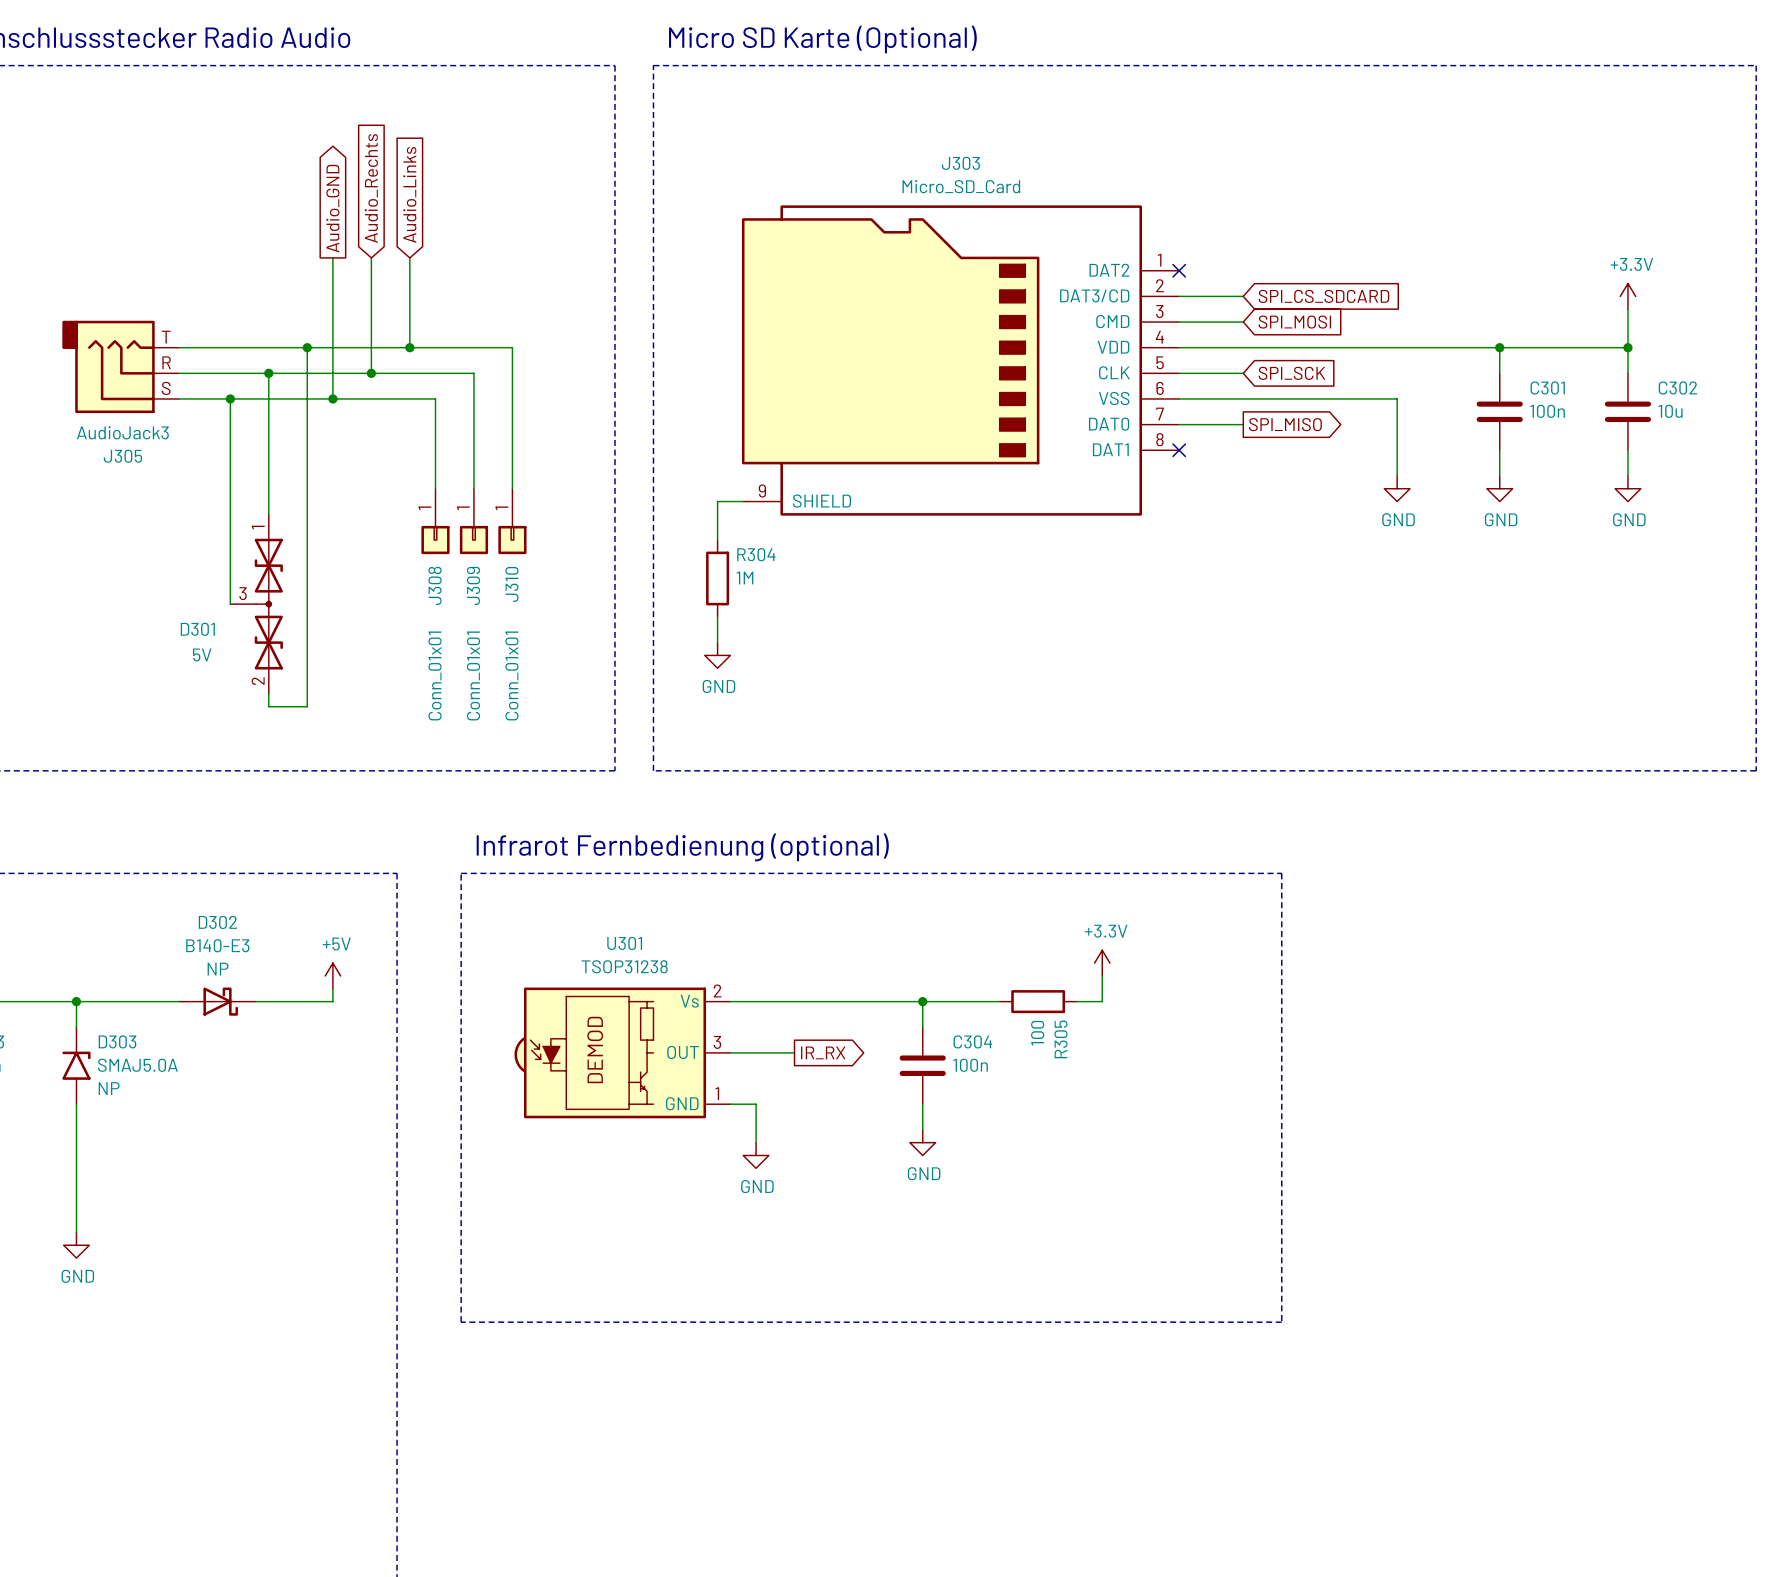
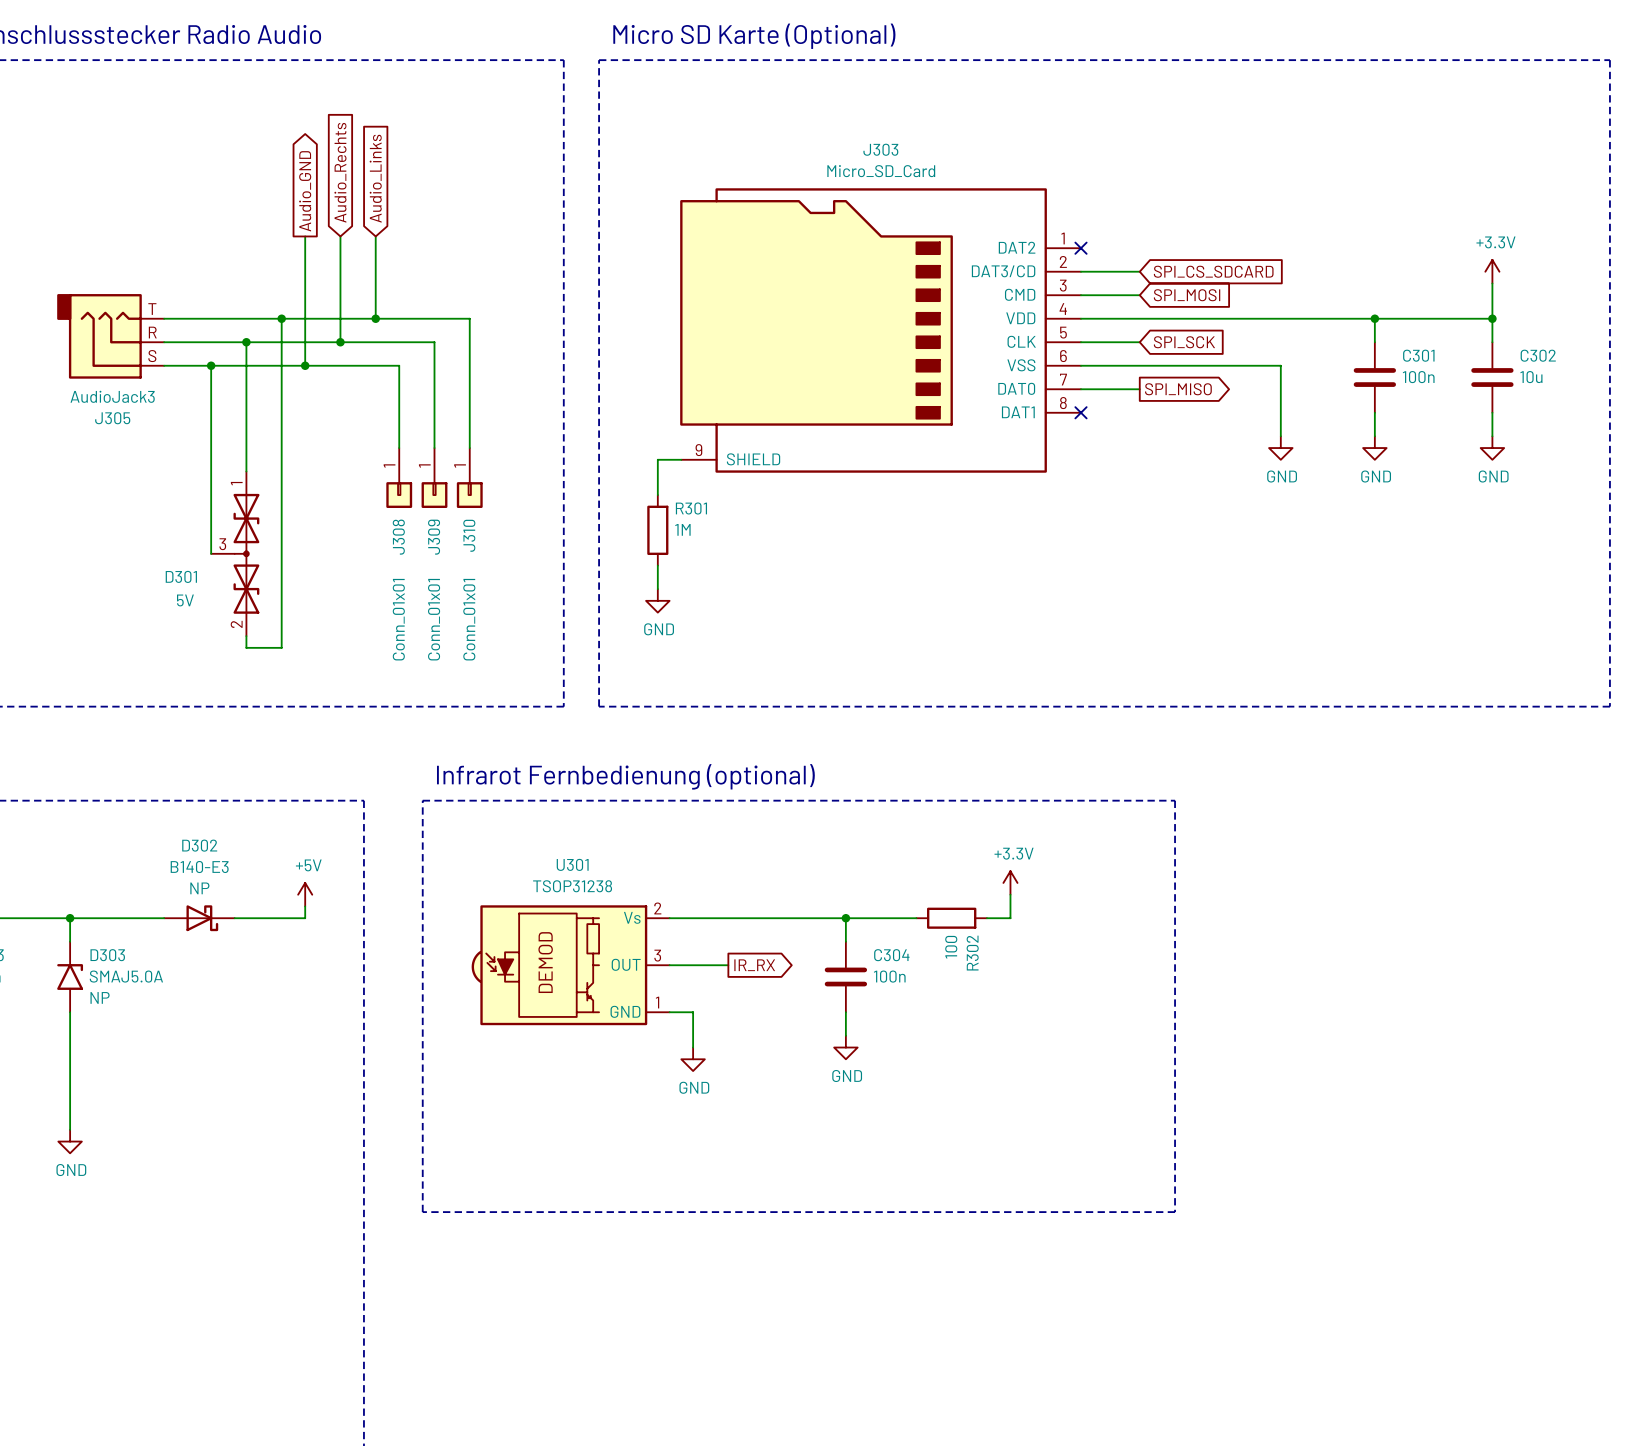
R304 name: R304 (756, 554) -> R301 (691, 508)
R305 name: R305 (1061, 1039) -> R302 (972, 953)

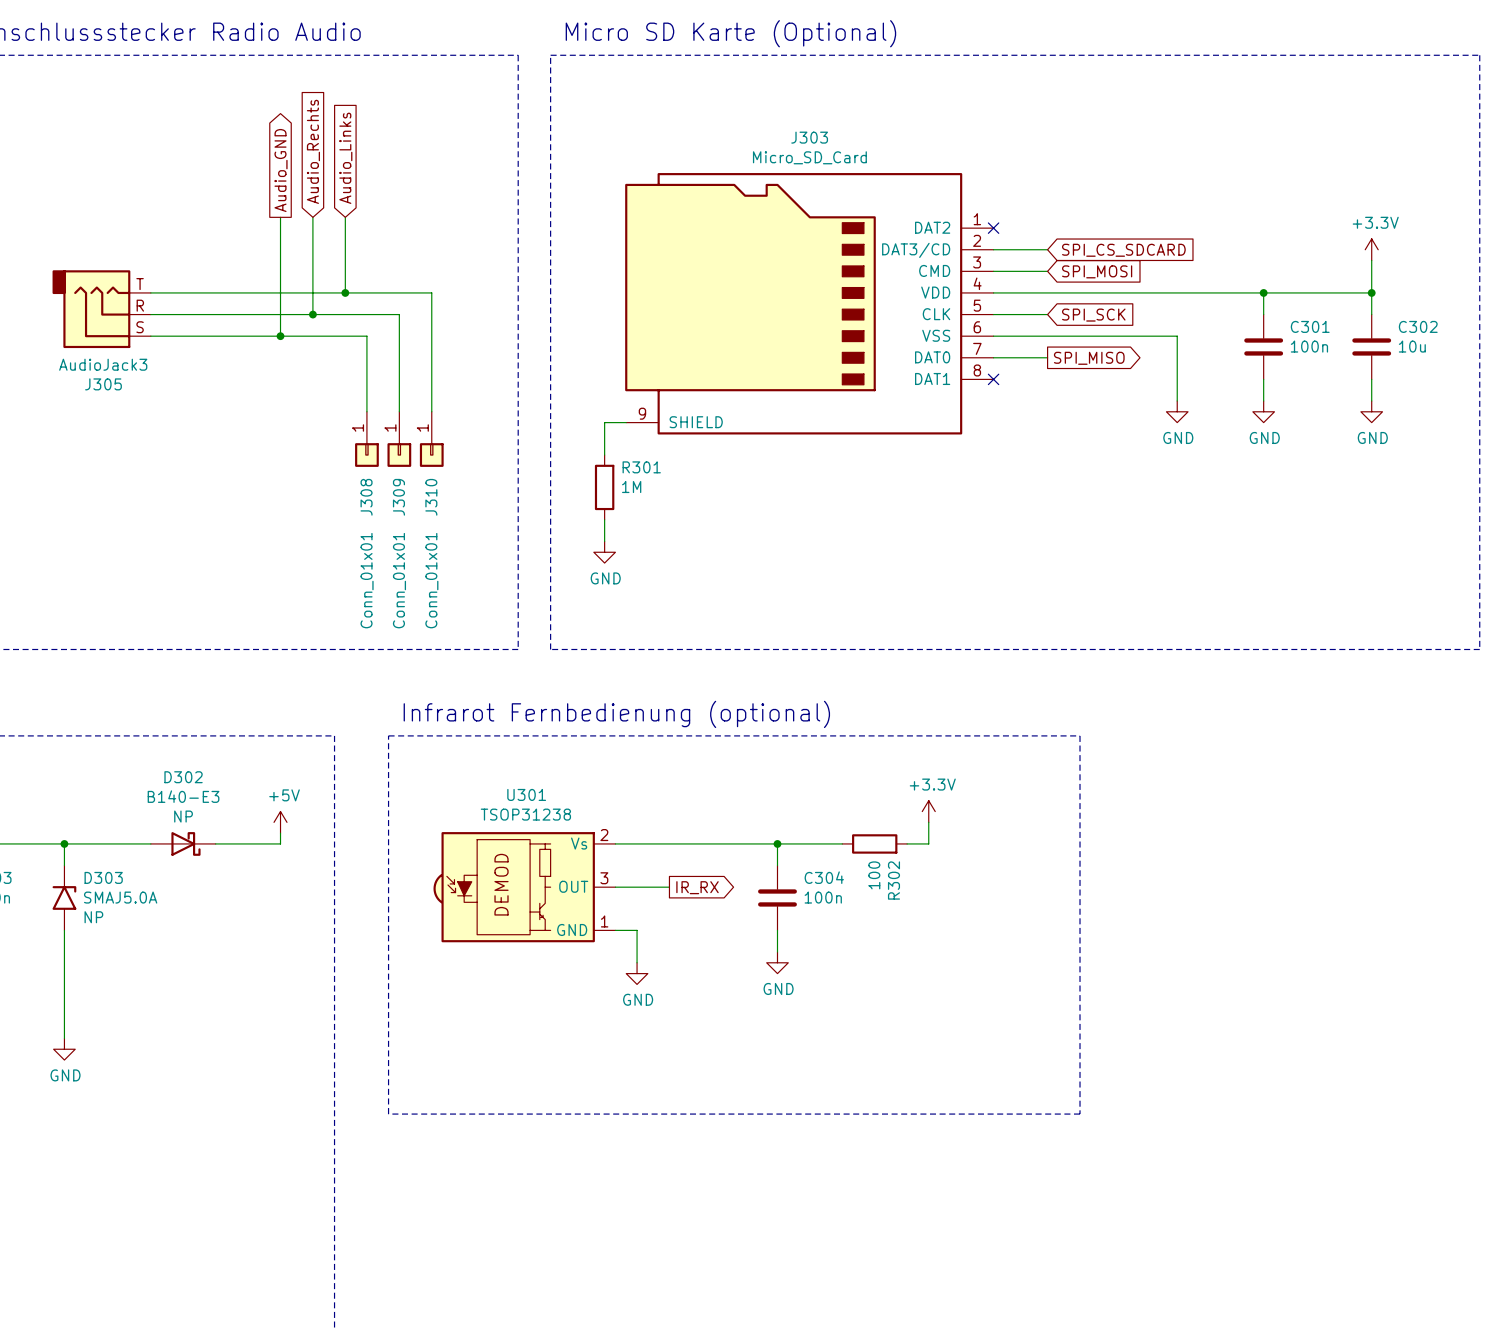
wire: (281, 318) (281, 647) (246, 647) (246, 636) -> none
junction: (281, 318) -> none
wire: (246, 342) (246, 471) -> none
junction: (246, 342) -> none
wire: (211, 365) (211, 553) -> none
junction: (211, 365) -> none
D301: 5V (235, 553) -> none

